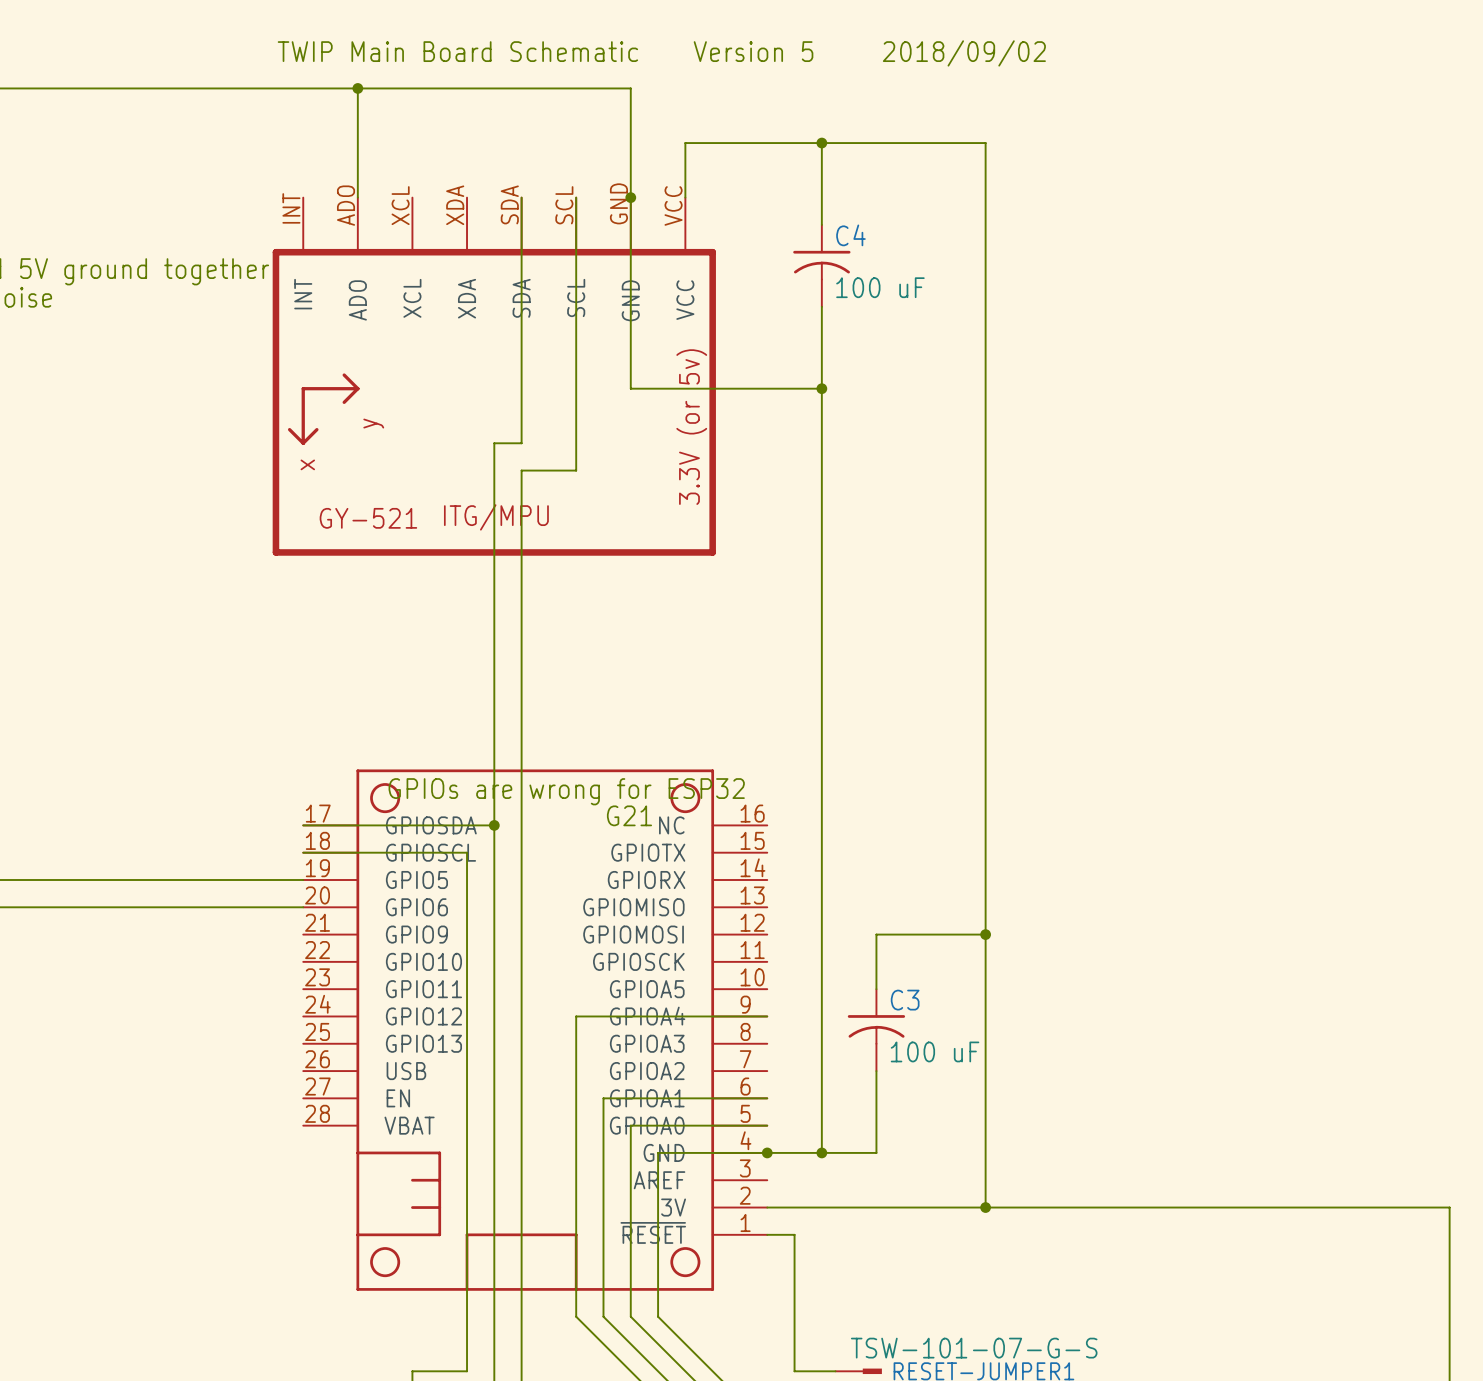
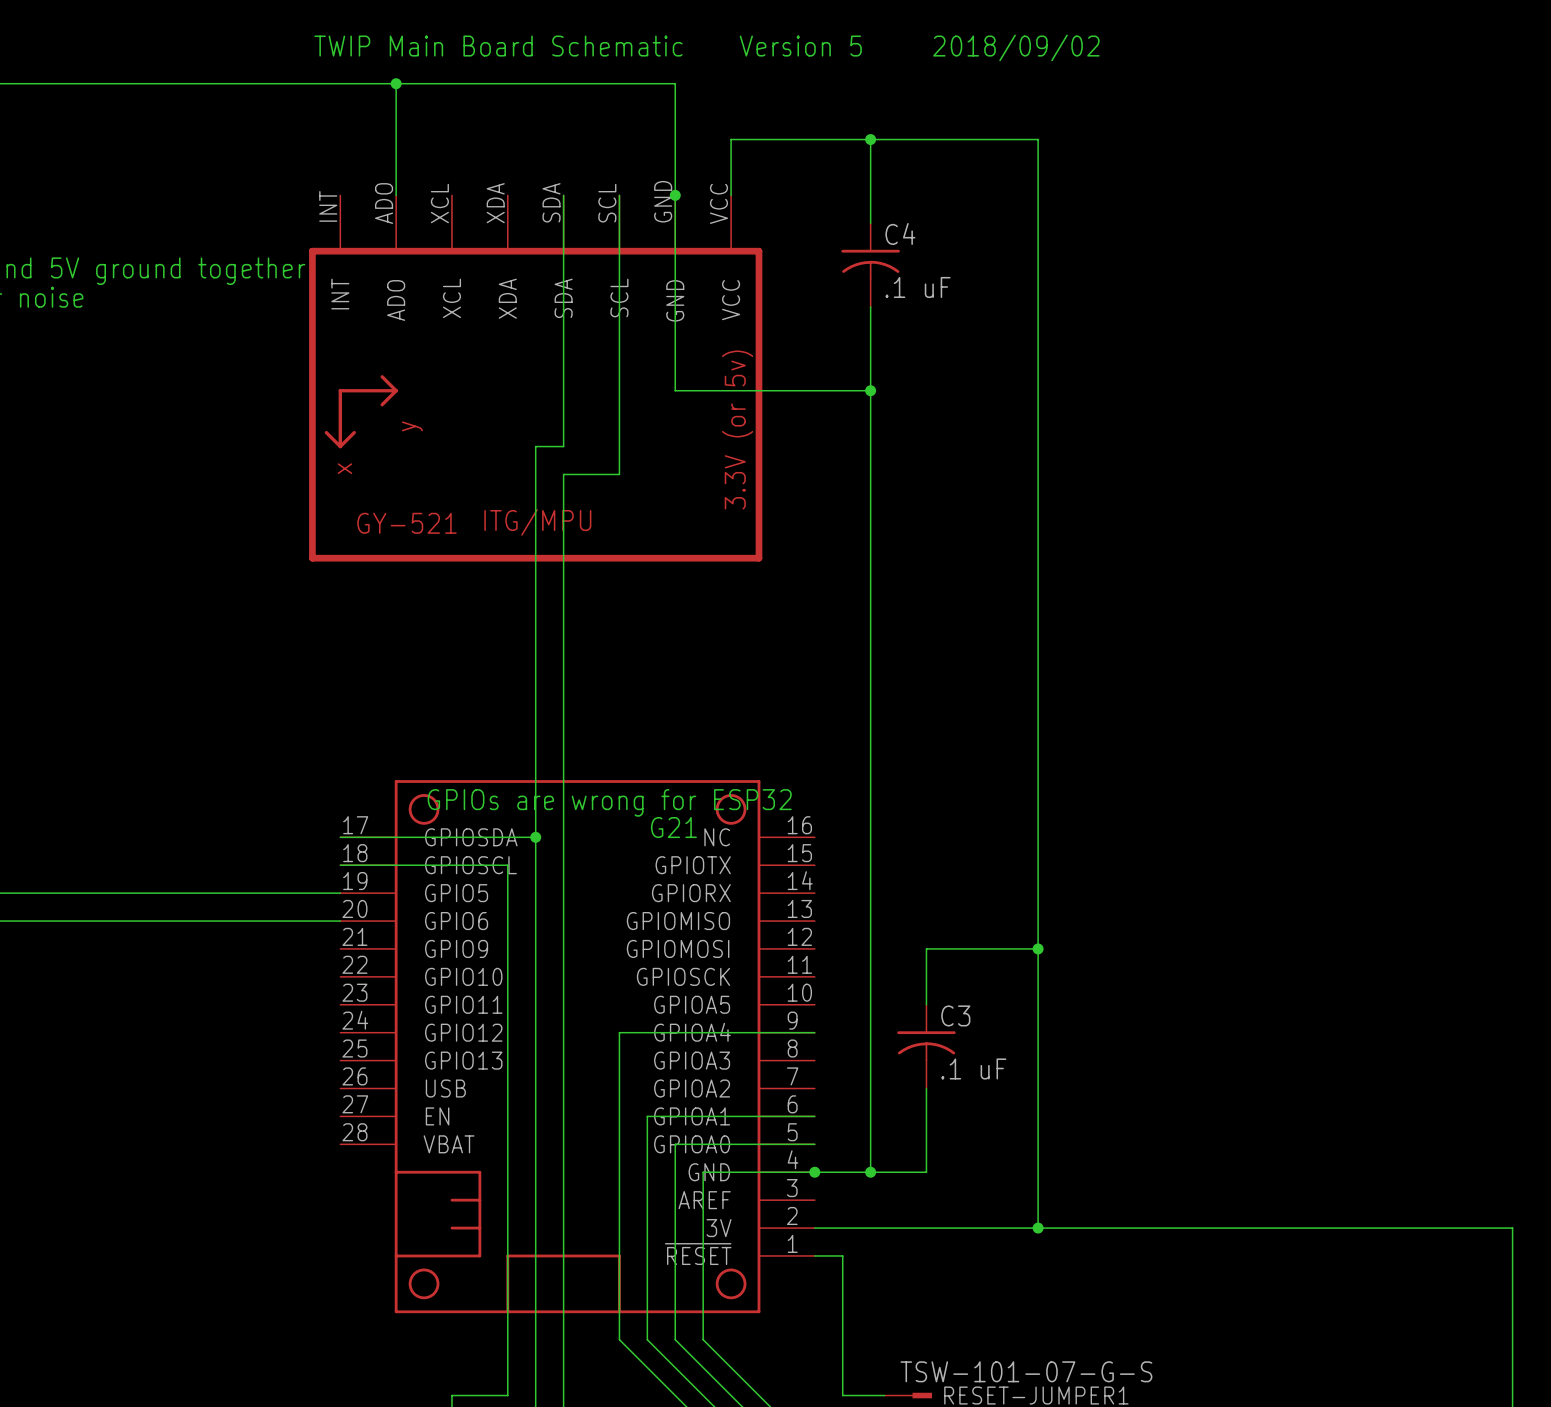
C4 value: 100 uF (880, 287) -> .1 uF (917, 287)
C3 value: 100 uF (935, 1051) -> .1 uF (973, 1068)

